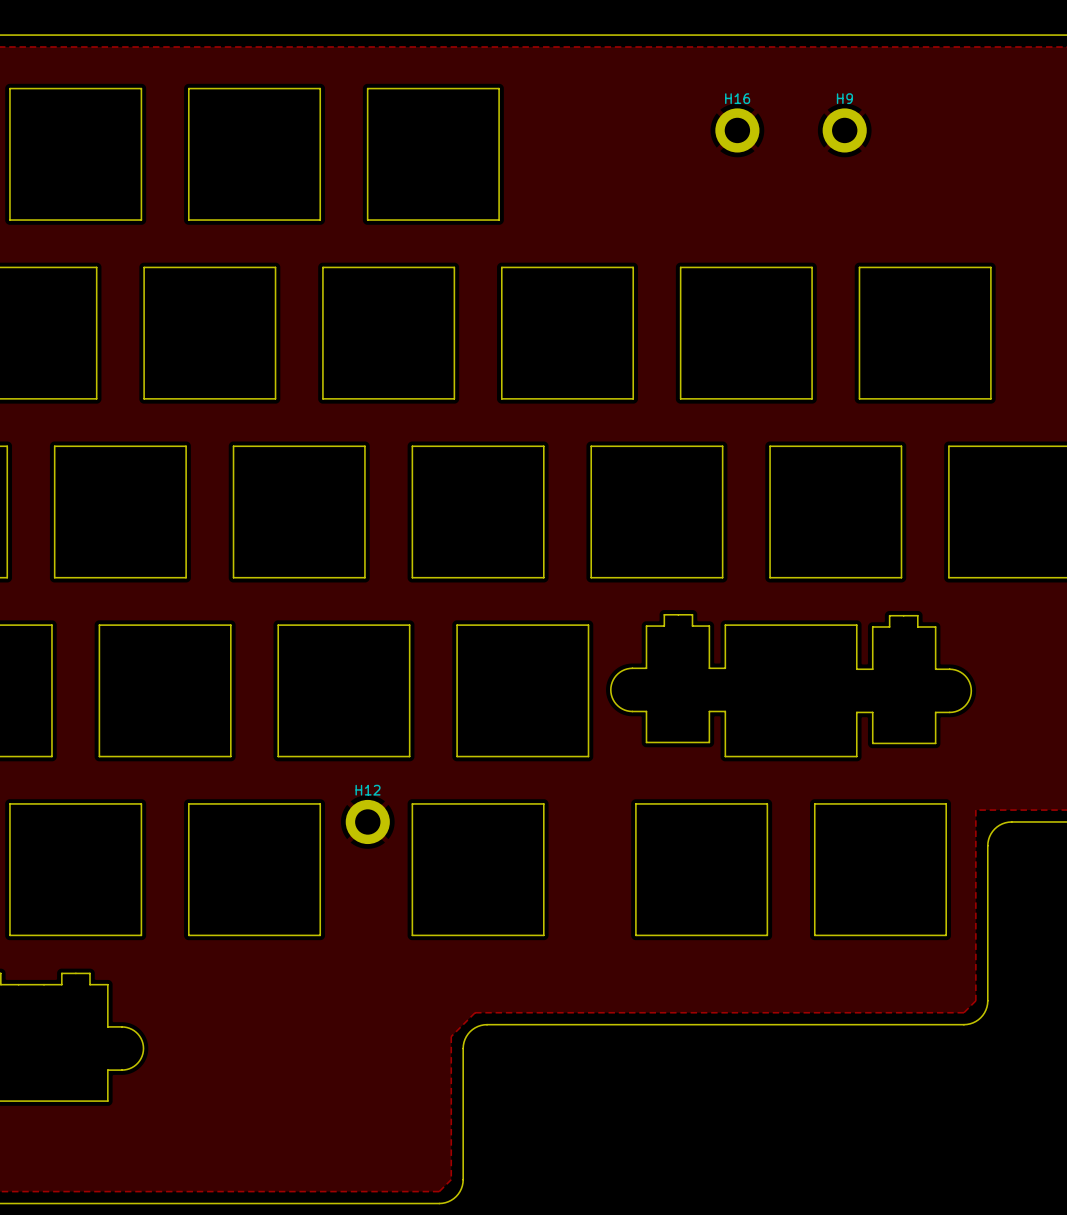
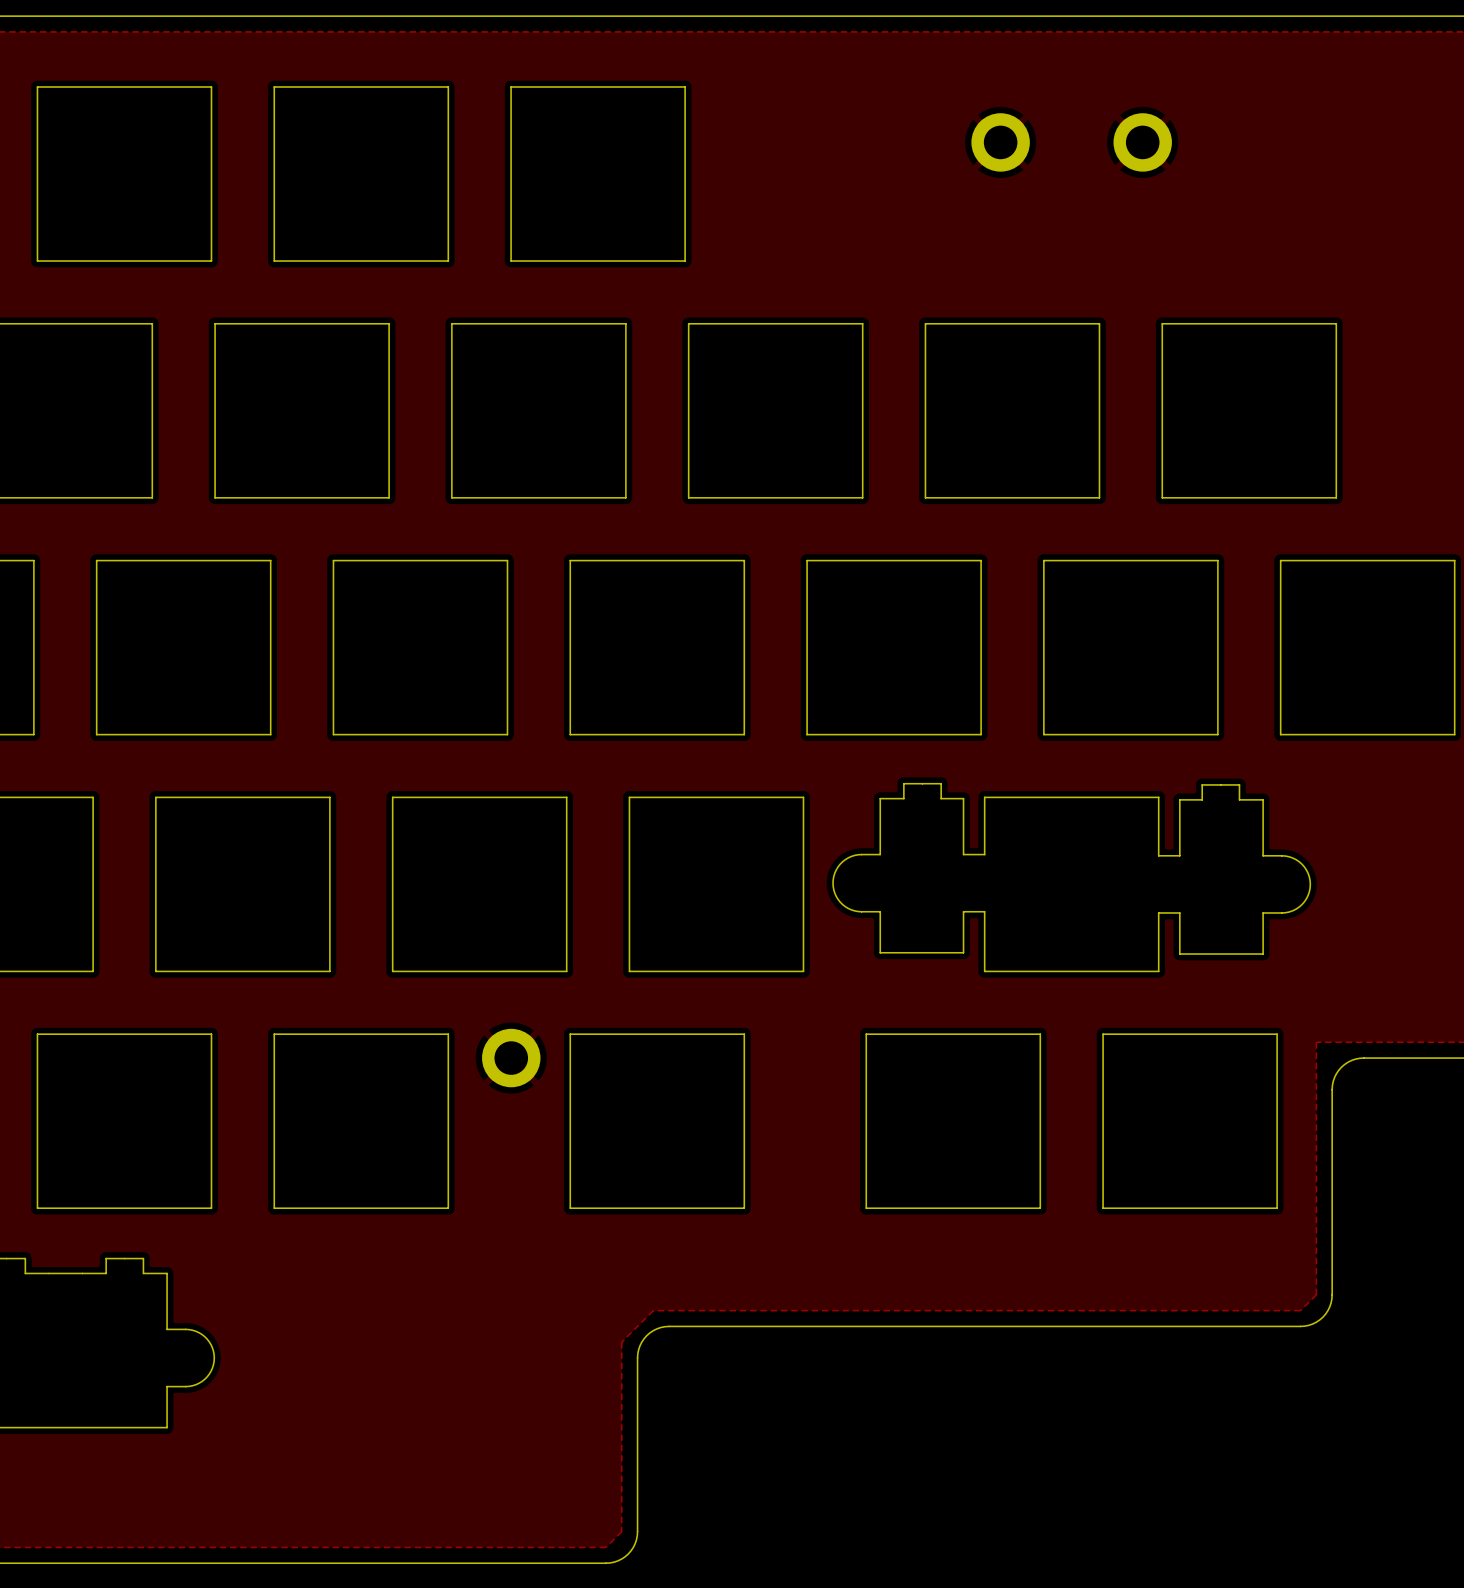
H16 name: H16 (737, 98) -> none
H9 name: H9 (844, 98) -> none
H12 name: H12 (368, 790) -> none

